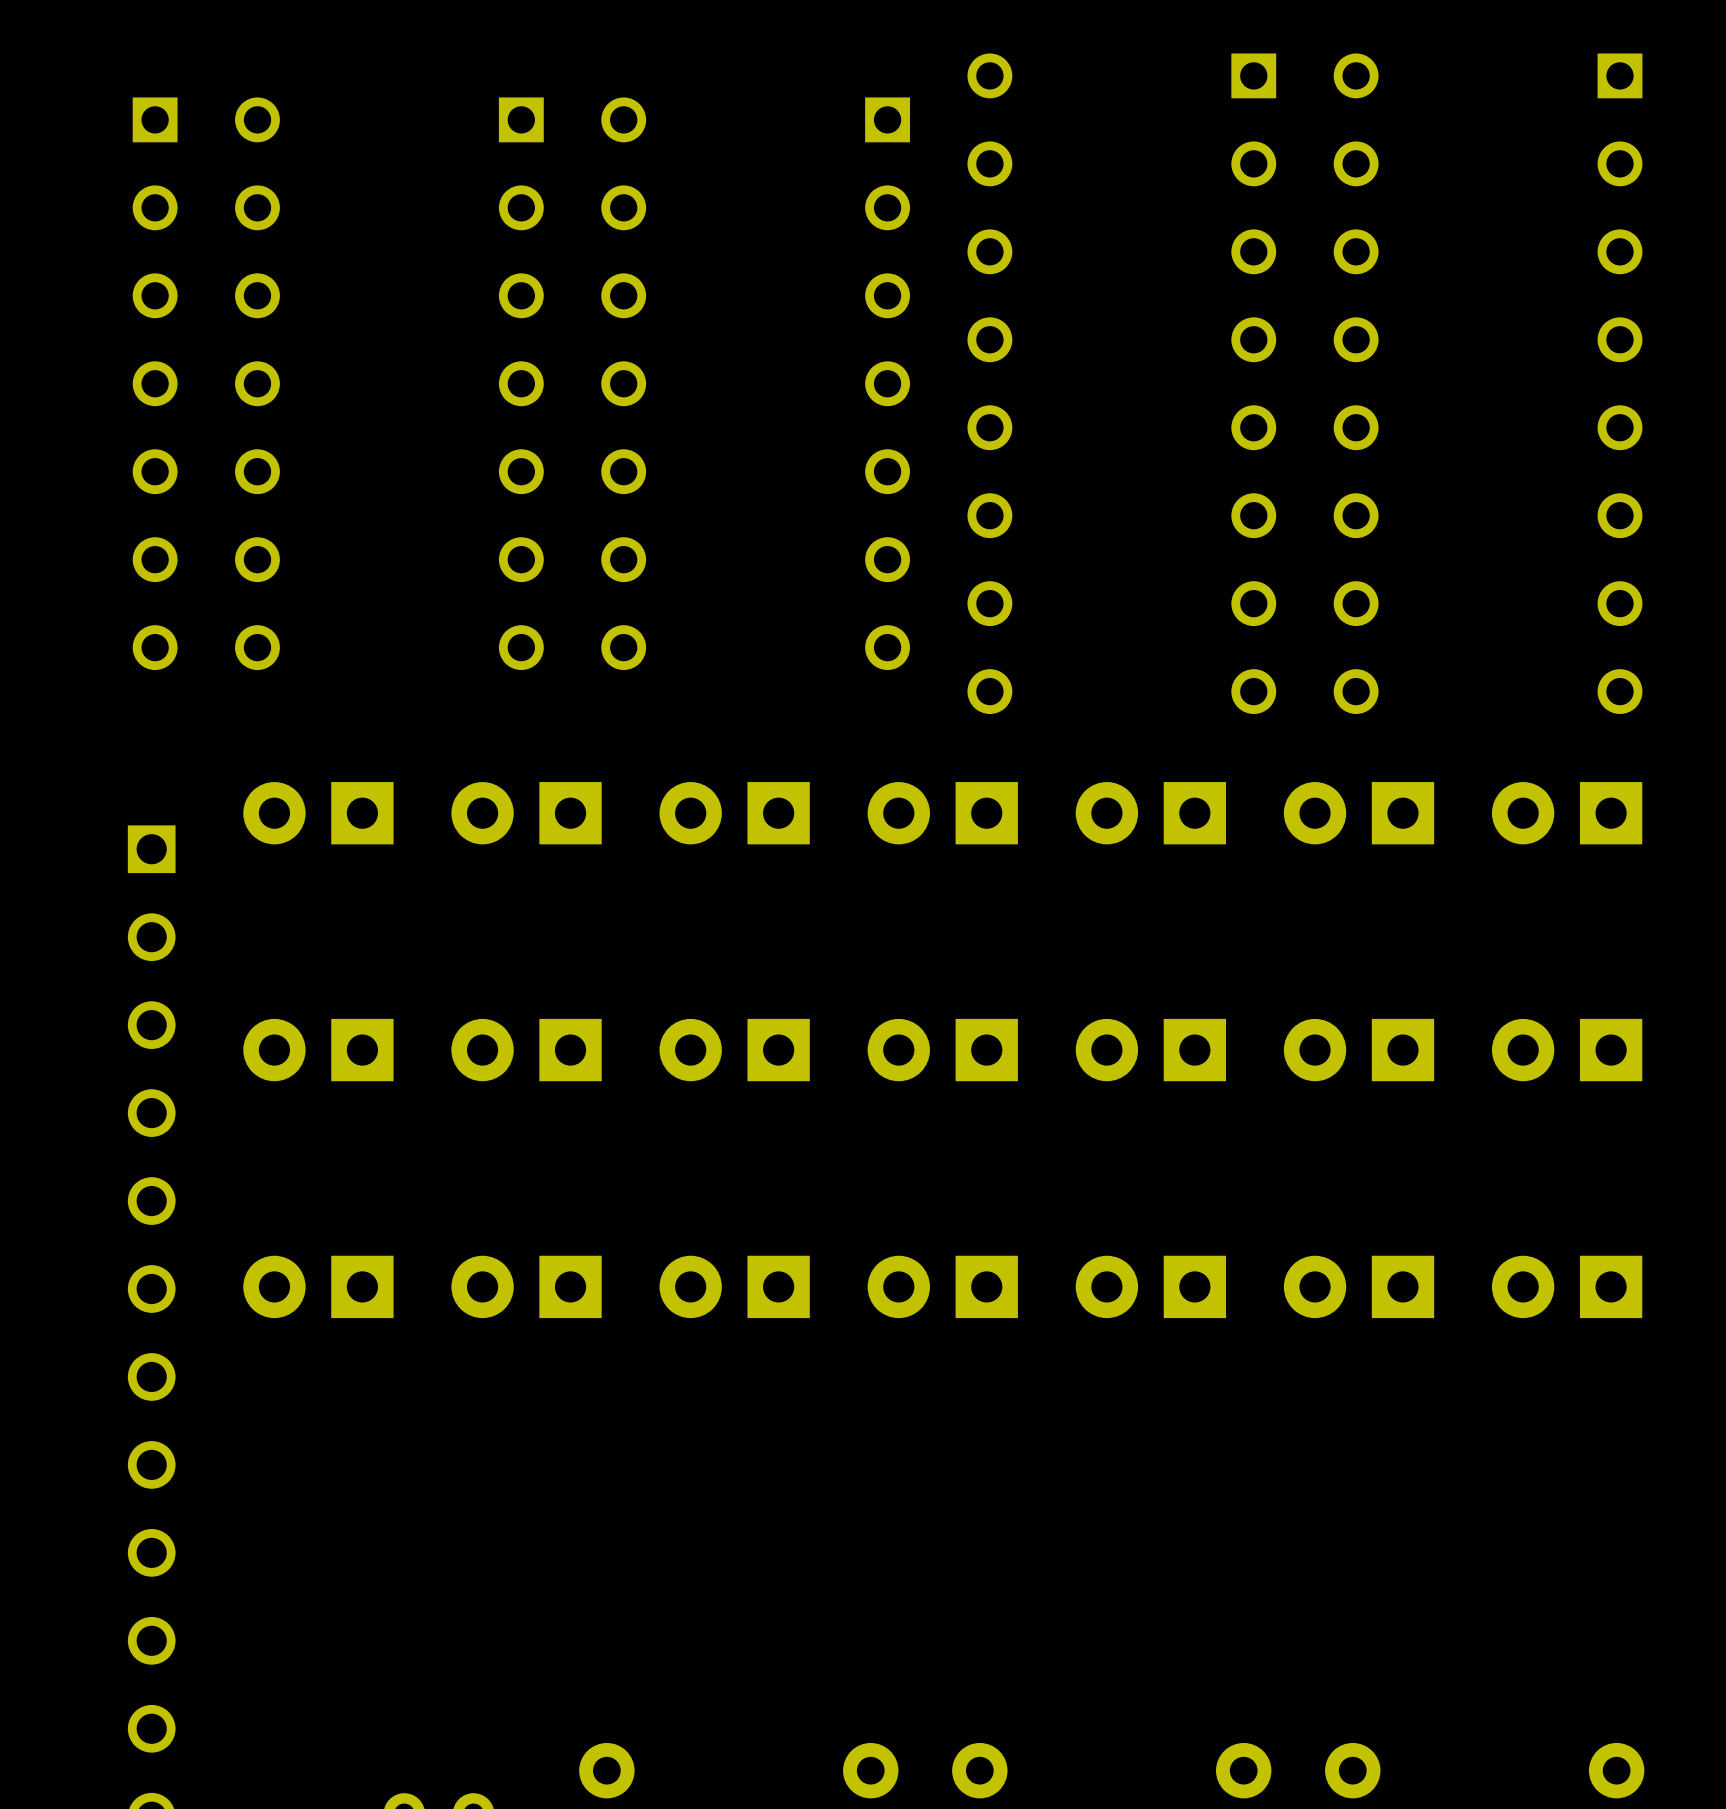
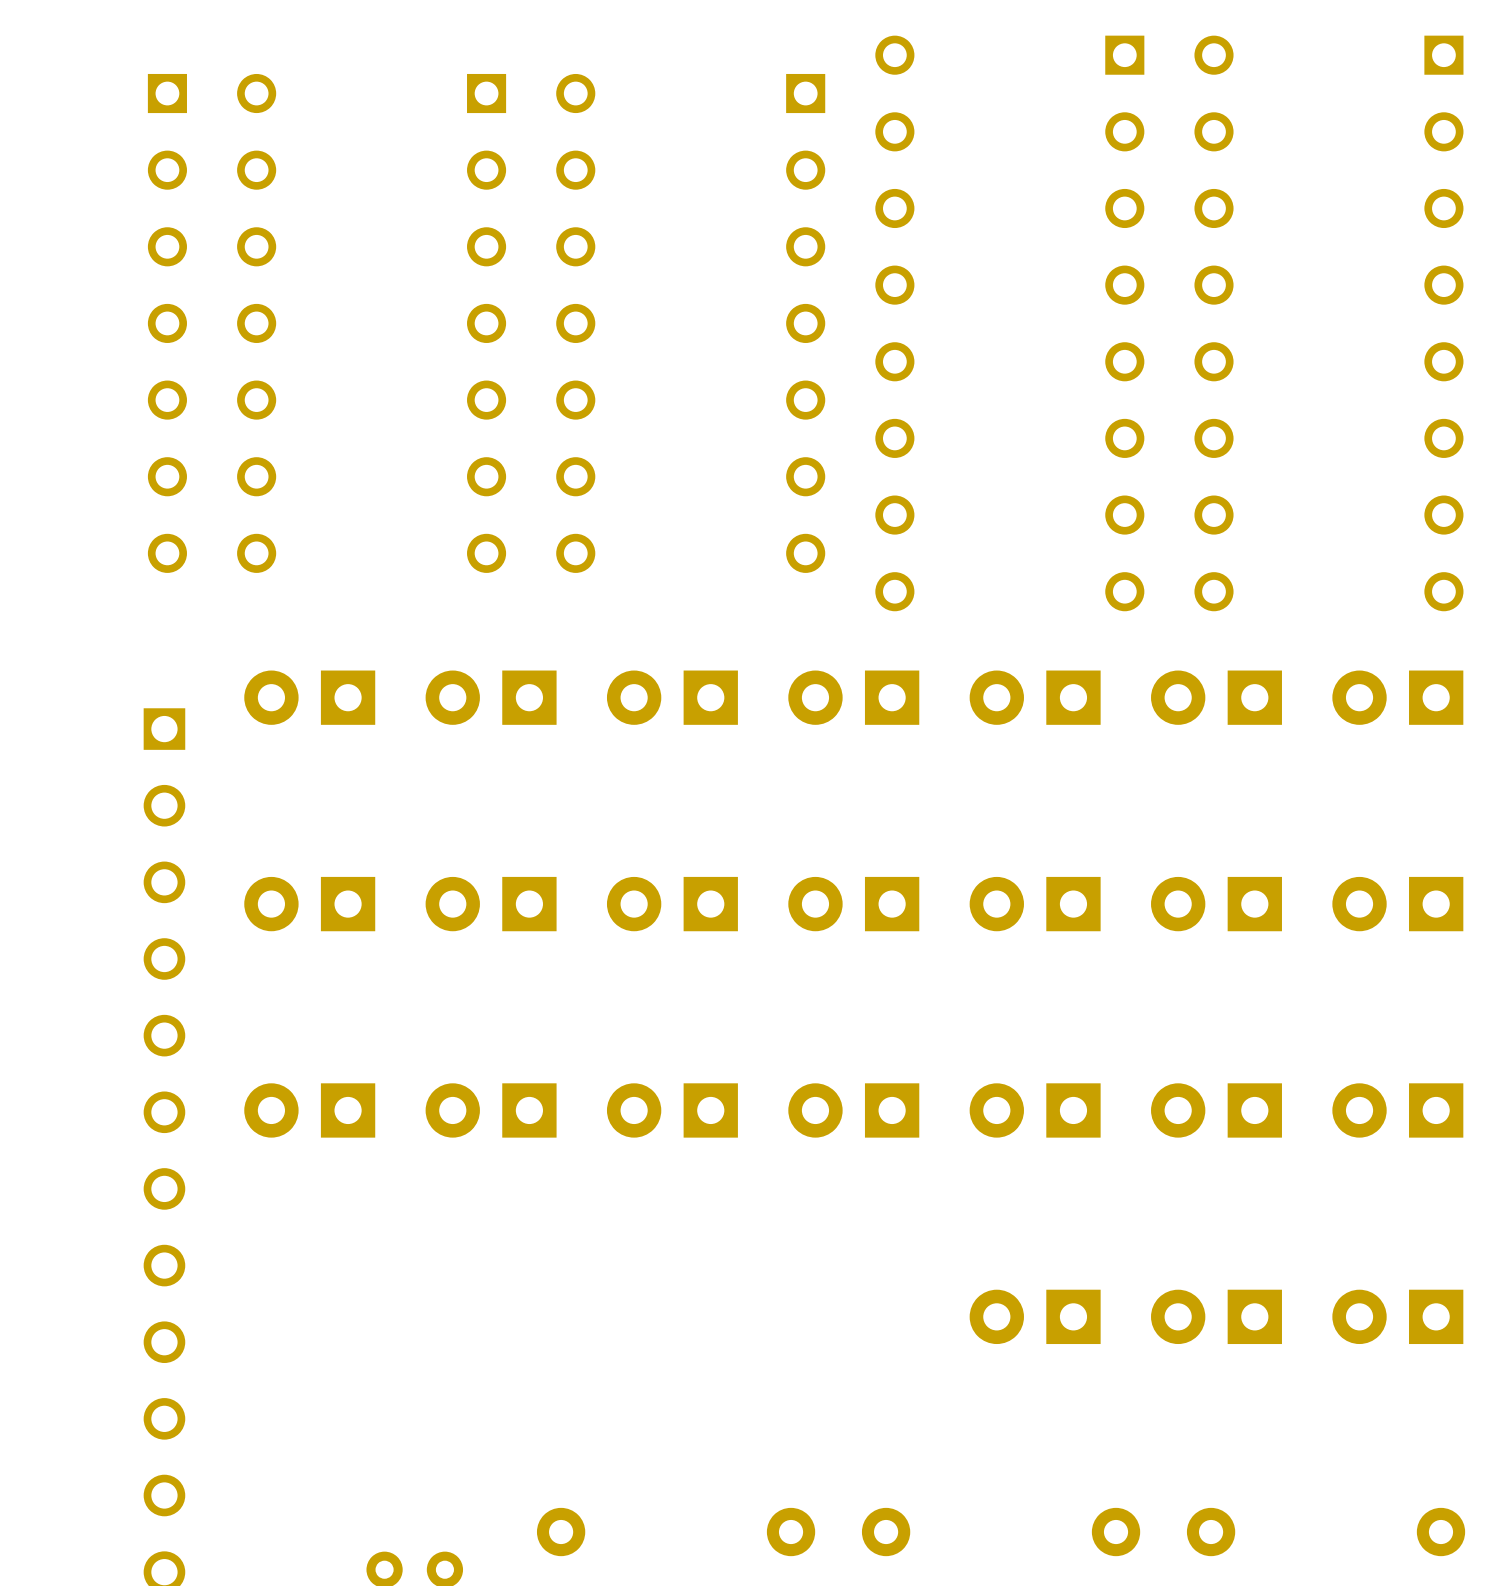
part: none -> (1035, 1316)
part: none -> (1216, 1316)
part: none -> (1397, 1316)

